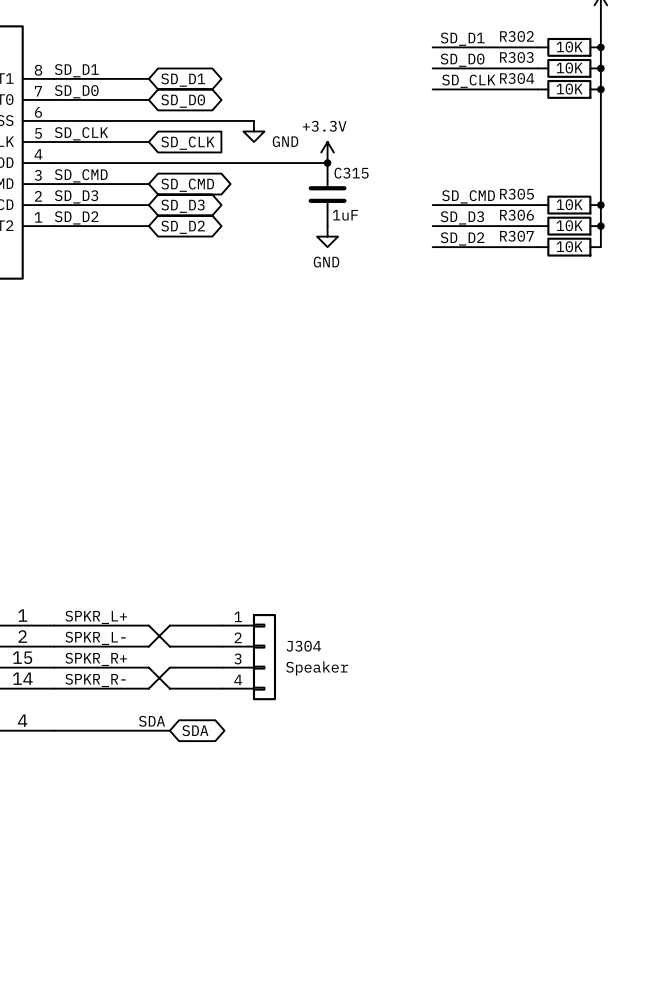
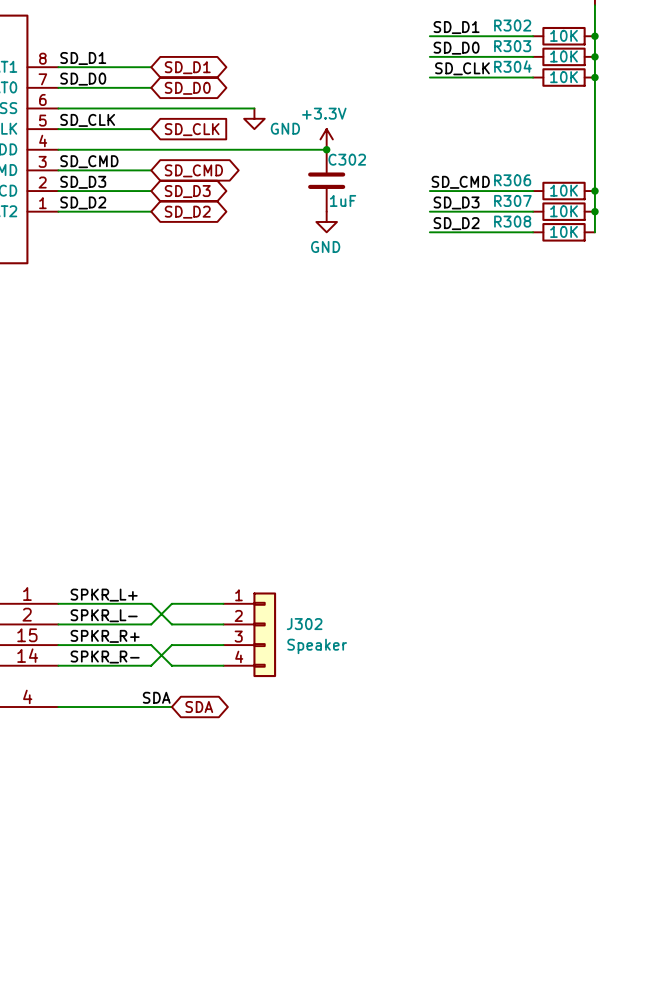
C315 name: C315 (351, 173) -> C302 (347, 159)
R305 name: R305 (516, 194) -> R306 (512, 180)
R306 name: R306 (516, 215) -> R307 (512, 200)
R307 name: R307 (516, 236) -> R308 (512, 221)
J304 name: J304 (303, 646) -> J302 (304, 624)

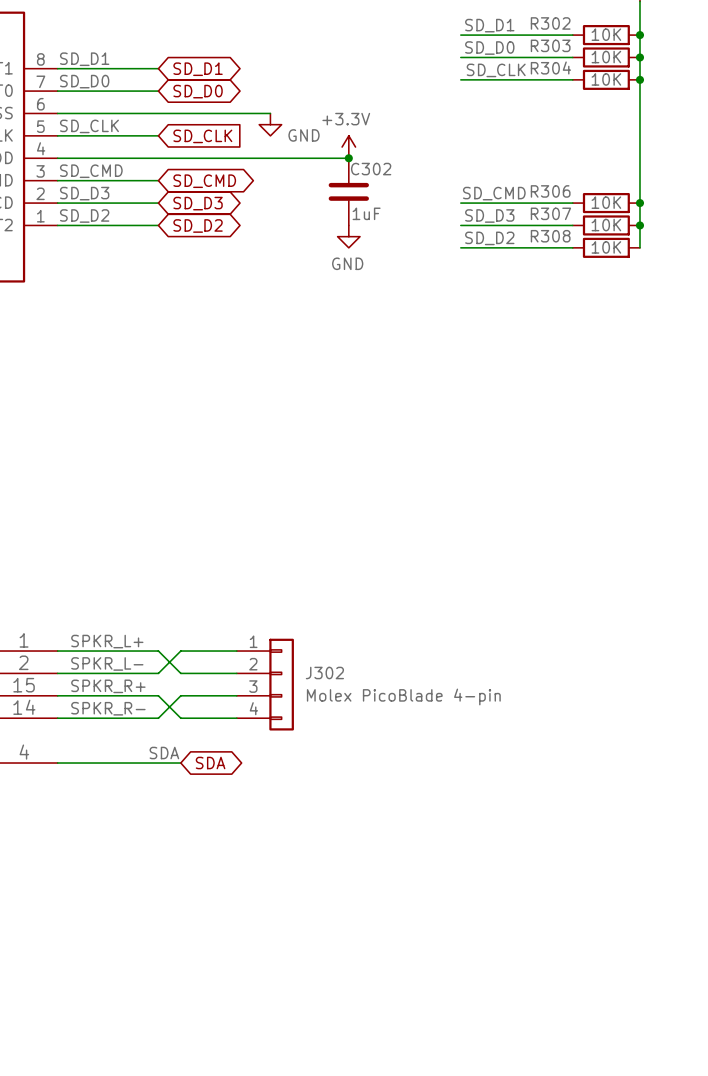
J302 value: Speaker (317, 646) -> Molex PicoBlade 4-pin (403, 696)

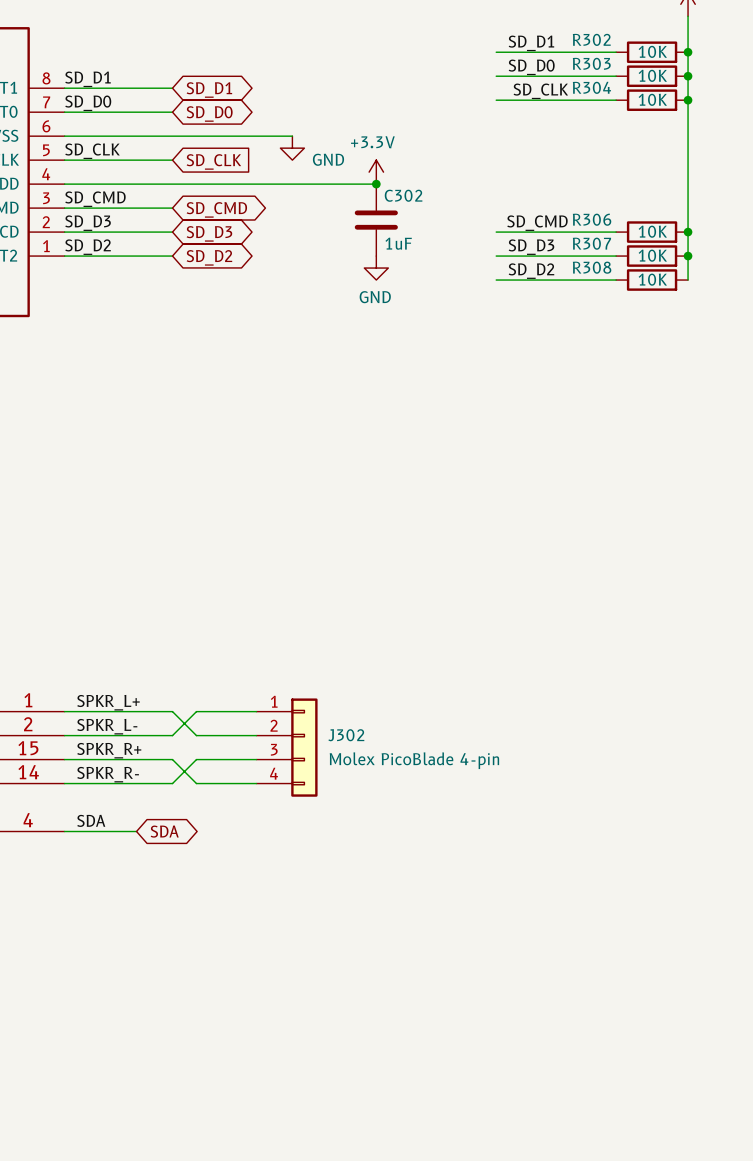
label position: SDA (164, 753) -> SDA (91, 820)
wire: (124, 763) (180, 763) -> none
global label position: SDA (210, 763) -> SDA (164, 831)

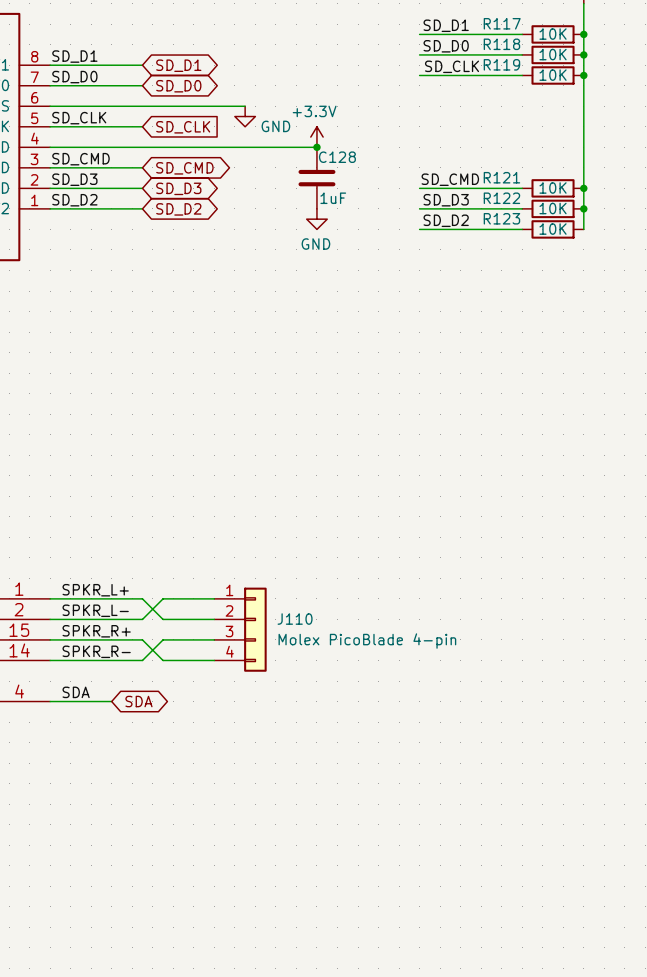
R302 name: R302 (591, 39) -> R117 (502, 23)
R303 name: R303 (591, 63) -> R118 (501, 44)
R304 name: R304 (591, 87) -> R119 (501, 64)
C302 name: C302 (403, 195) -> C128 (337, 157)
R306 name: R306 (592, 219) -> R121 (501, 177)
R307 name: R307 (591, 243) -> R122 (501, 198)
R308 name: R308 (592, 267) -> R123 (501, 218)
J302 name: J302 (346, 735) -> J110 (295, 619)

